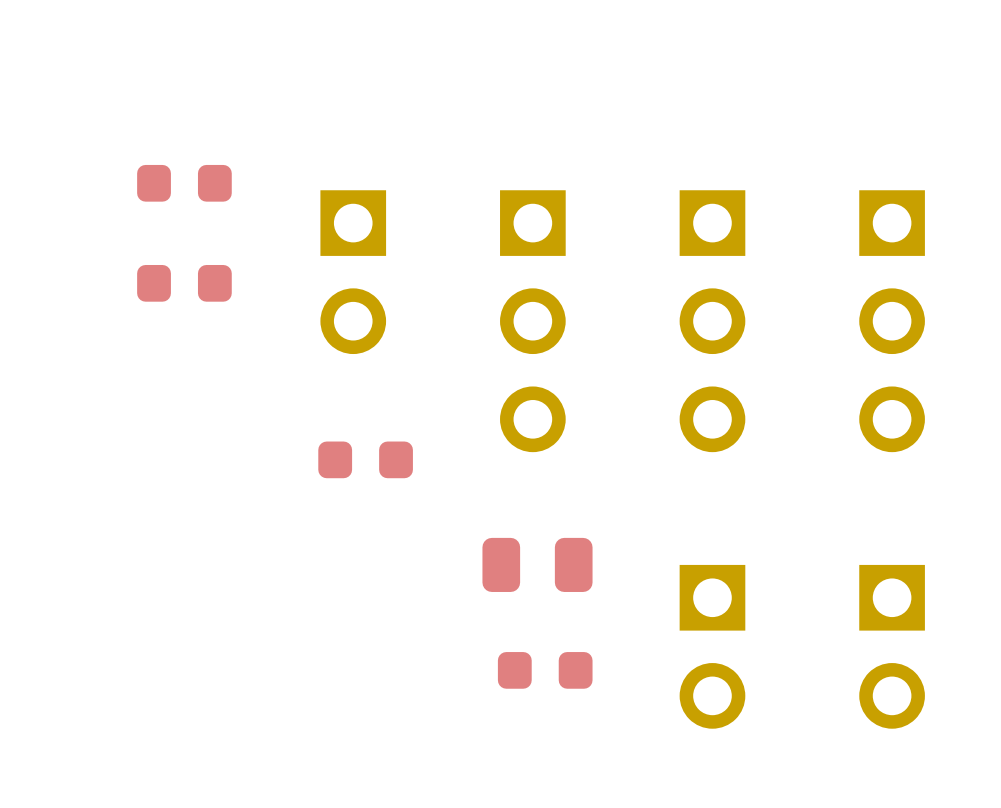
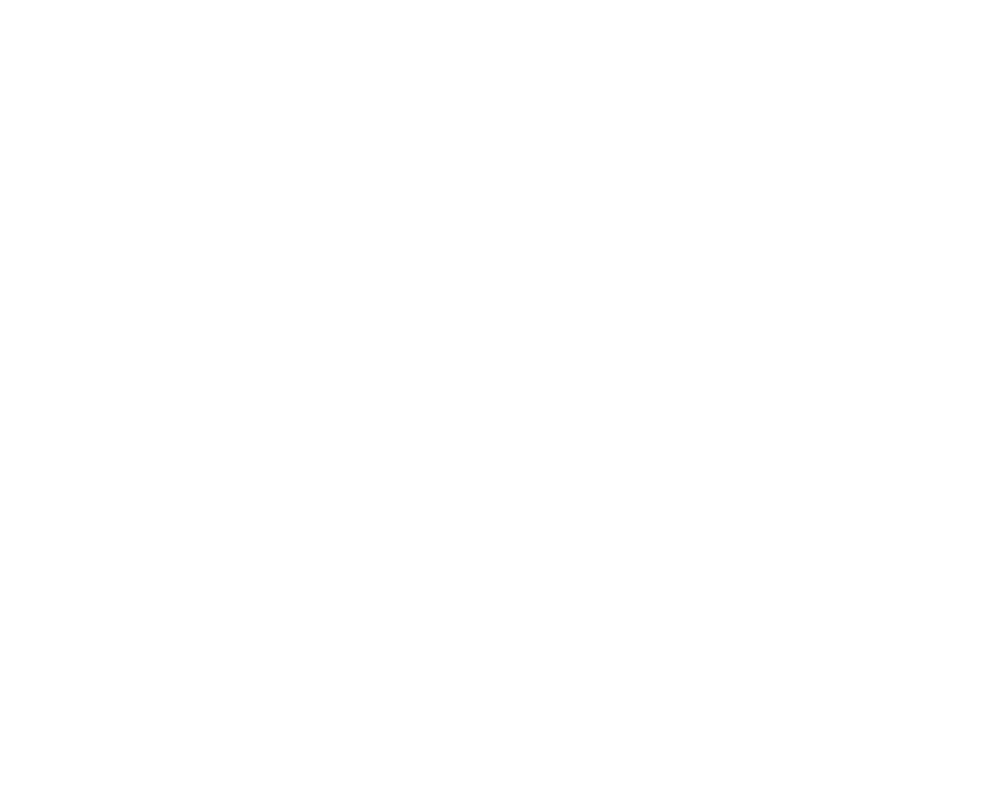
part: (184, 183) -> none
part: (353, 272) -> none
part: (184, 283) -> none
part: (532, 321) -> none
part: (712, 321) -> none
part: (892, 321) -> none
part: (365, 459) -> none
part: (537, 564) -> none
part: (712, 646) -> none
part: (892, 646) -> none
part: (545, 670) -> none

